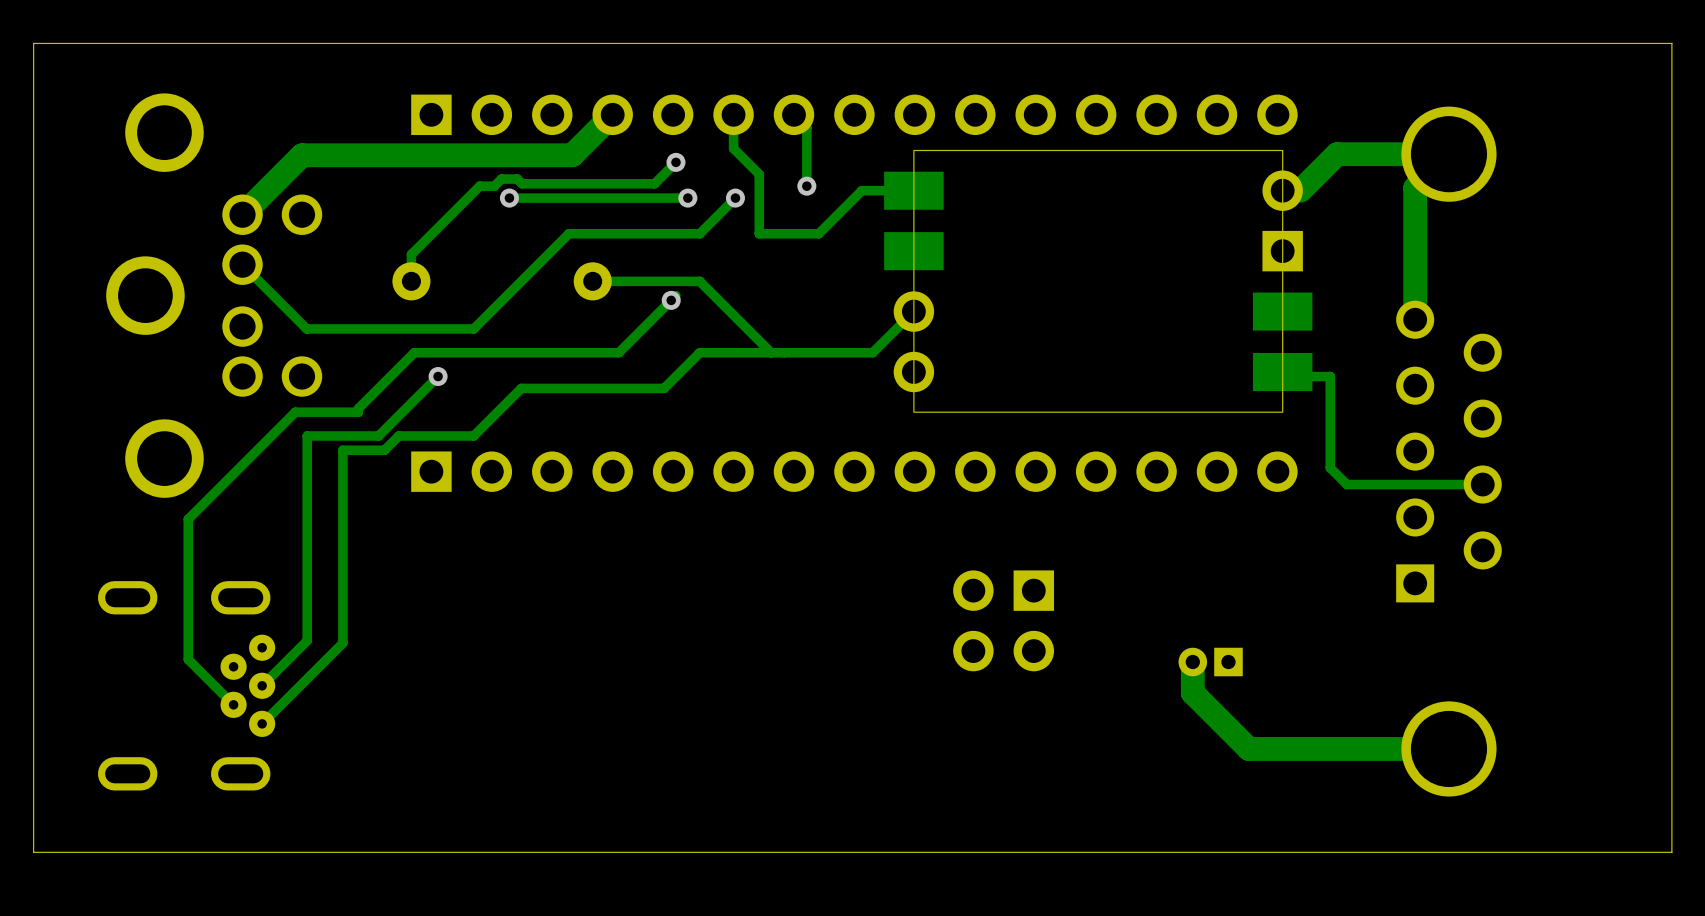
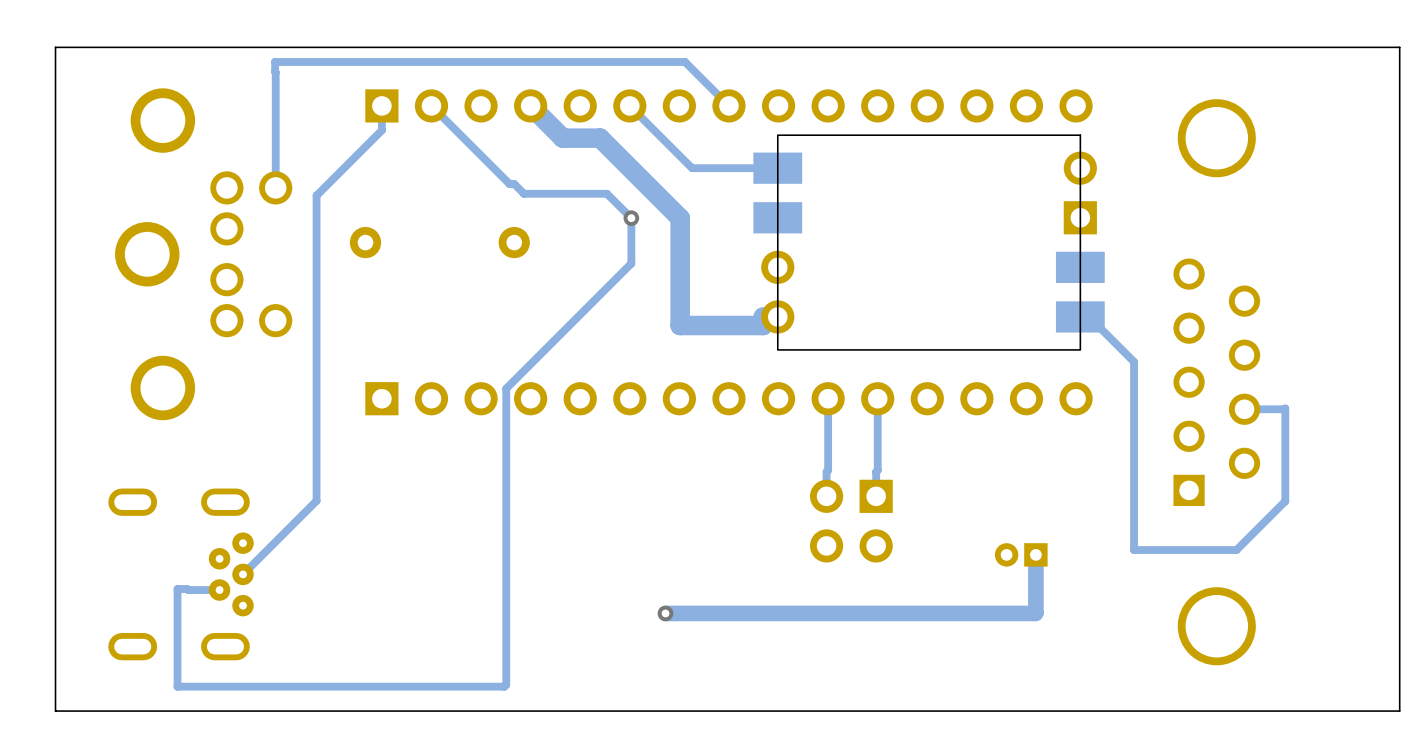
track: (612, 114) (572, 155) (301, 155) (242, 214) -> (530, 105) (562, 138) (600, 138) (680, 218) (680, 325) (763, 325) (763, 316)
track: (733, 114) (733, 148) (759, 174) (759, 233) (818, 233) (861, 190) -> (629, 105) (692, 168) (735, 168)
track: (793, 114) (806, 127) (806, 186) -> none
track: none -> (728, 105) (685, 62) (275, 62) (275, 187)
track: (675, 162) (654, 183) (522, 183) (517, 179) (501, 179) (494, 186) (479, 186) (411, 254) (411, 281) -> none
via: (675, 162) -> none
via: (806, 186) -> none
track: (1300, 190) (1337, 154) (1448, 154) (1415, 187) (1415, 319) -> none
via: (509, 198) -> none
track: (687, 198) (509, 198) -> none
via: (687, 198) -> none
track: (735, 198) (699, 233) (568, 233) (473, 328) (306, 328) (242, 264) -> none
via: (735, 198) -> none
via: none -> (631, 218)
track: (592, 281) (699, 281) (771, 352) -> none
track: (675, 295) (618, 352) (414, 352) (358, 408) (358, 412) (295, 412) (188, 519) (188, 659) (233, 704) -> (431, 105) (509, 184) (514, 184) (524, 193) (606, 193) (631, 218) (631, 263) (506, 388) (506, 684) (504, 686) (177, 686) (177, 589) (219, 590)
via: (671, 300) -> none
track: (903, 311) (903, 322) (872, 352) (699, 352) (664, 388) (521, 388) (473, 435) (398, 435) (384, 450) (342, 450) (342, 643) (262, 723) -> none
track: (1293, 371) (1293, 376) (1330, 376) (1330, 467) (1346, 484) (1482, 484) -> (1089, 316) (1134, 361) (1134, 550) (1236, 550) (1285, 501) (1285, 408) (1244, 409)
track: (438, 376) (378, 435) (307, 435) (307, 640) -> (381, 105) (381, 130) (316, 195) (316, 500) (280, 537)
via: (438, 376) -> none
track: none -> (828, 398) (826, 496)
track: none -> (877, 398) (876, 496)
track: (1192, 662) (1192, 692) (1248, 748) (1448, 748) -> none
track: none -> (1035, 554) (1035, 613) (665, 613)
via: none -> (665, 613)

